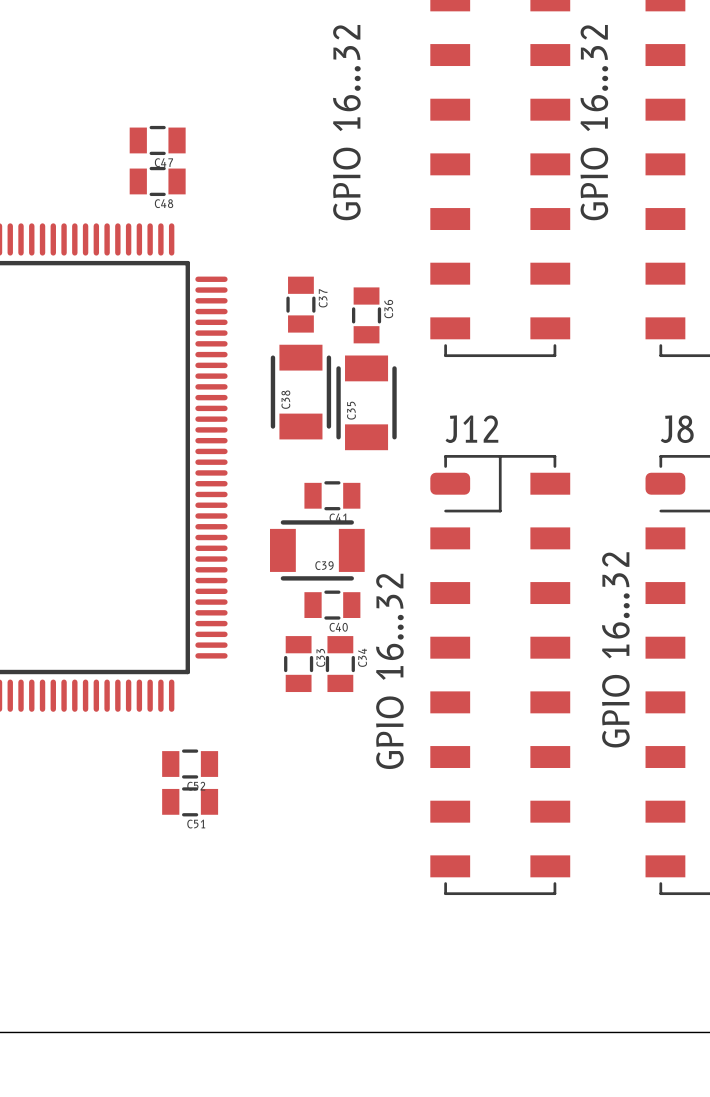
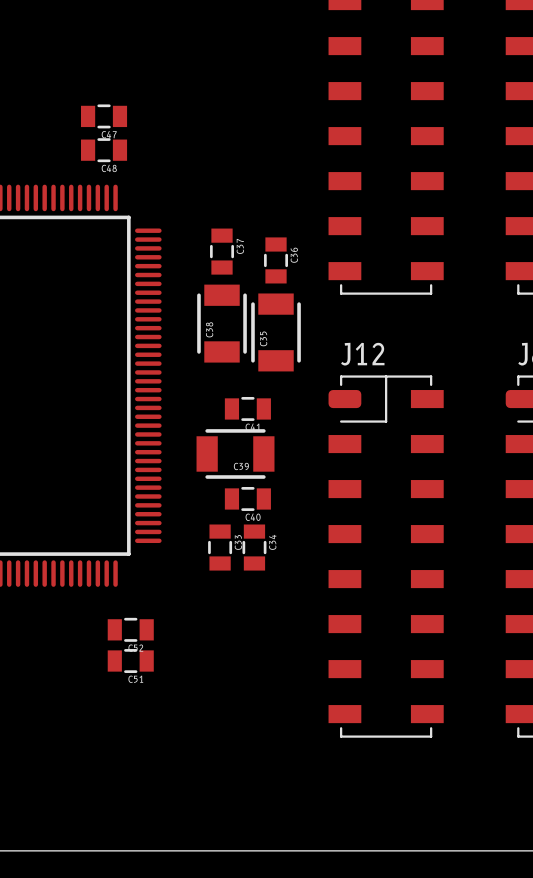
text: GPIO 16...32 (346, 122) -> none
text: GPIO 16...32 (594, 122) -> none
text: GPIO 16...32 (615, 649) -> none
text: GPIO 16...32 (389, 671) -> none

